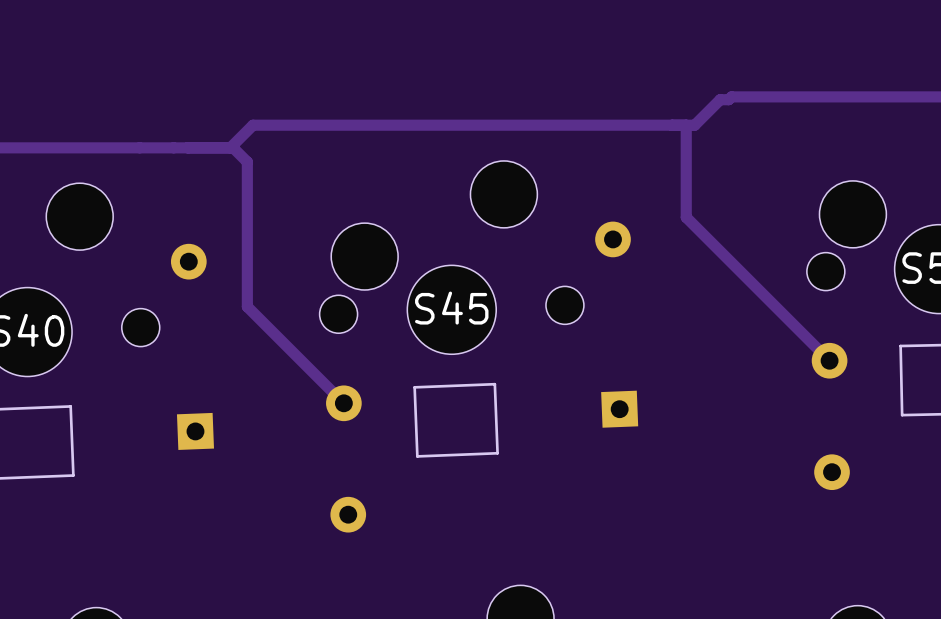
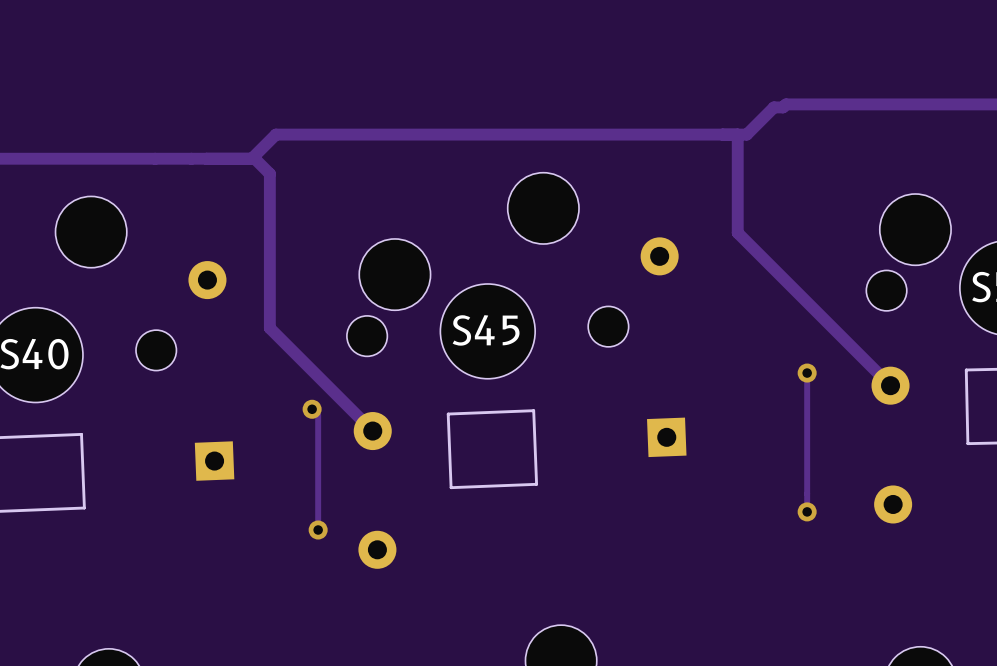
track: none -> (807, 373) (807, 511)
via: none -> (807, 373)
track: none -> (312, 409) (318, 415) (318, 530)
via: none -> (312, 409)
via: none -> (807, 511)
via: none -> (318, 530)

